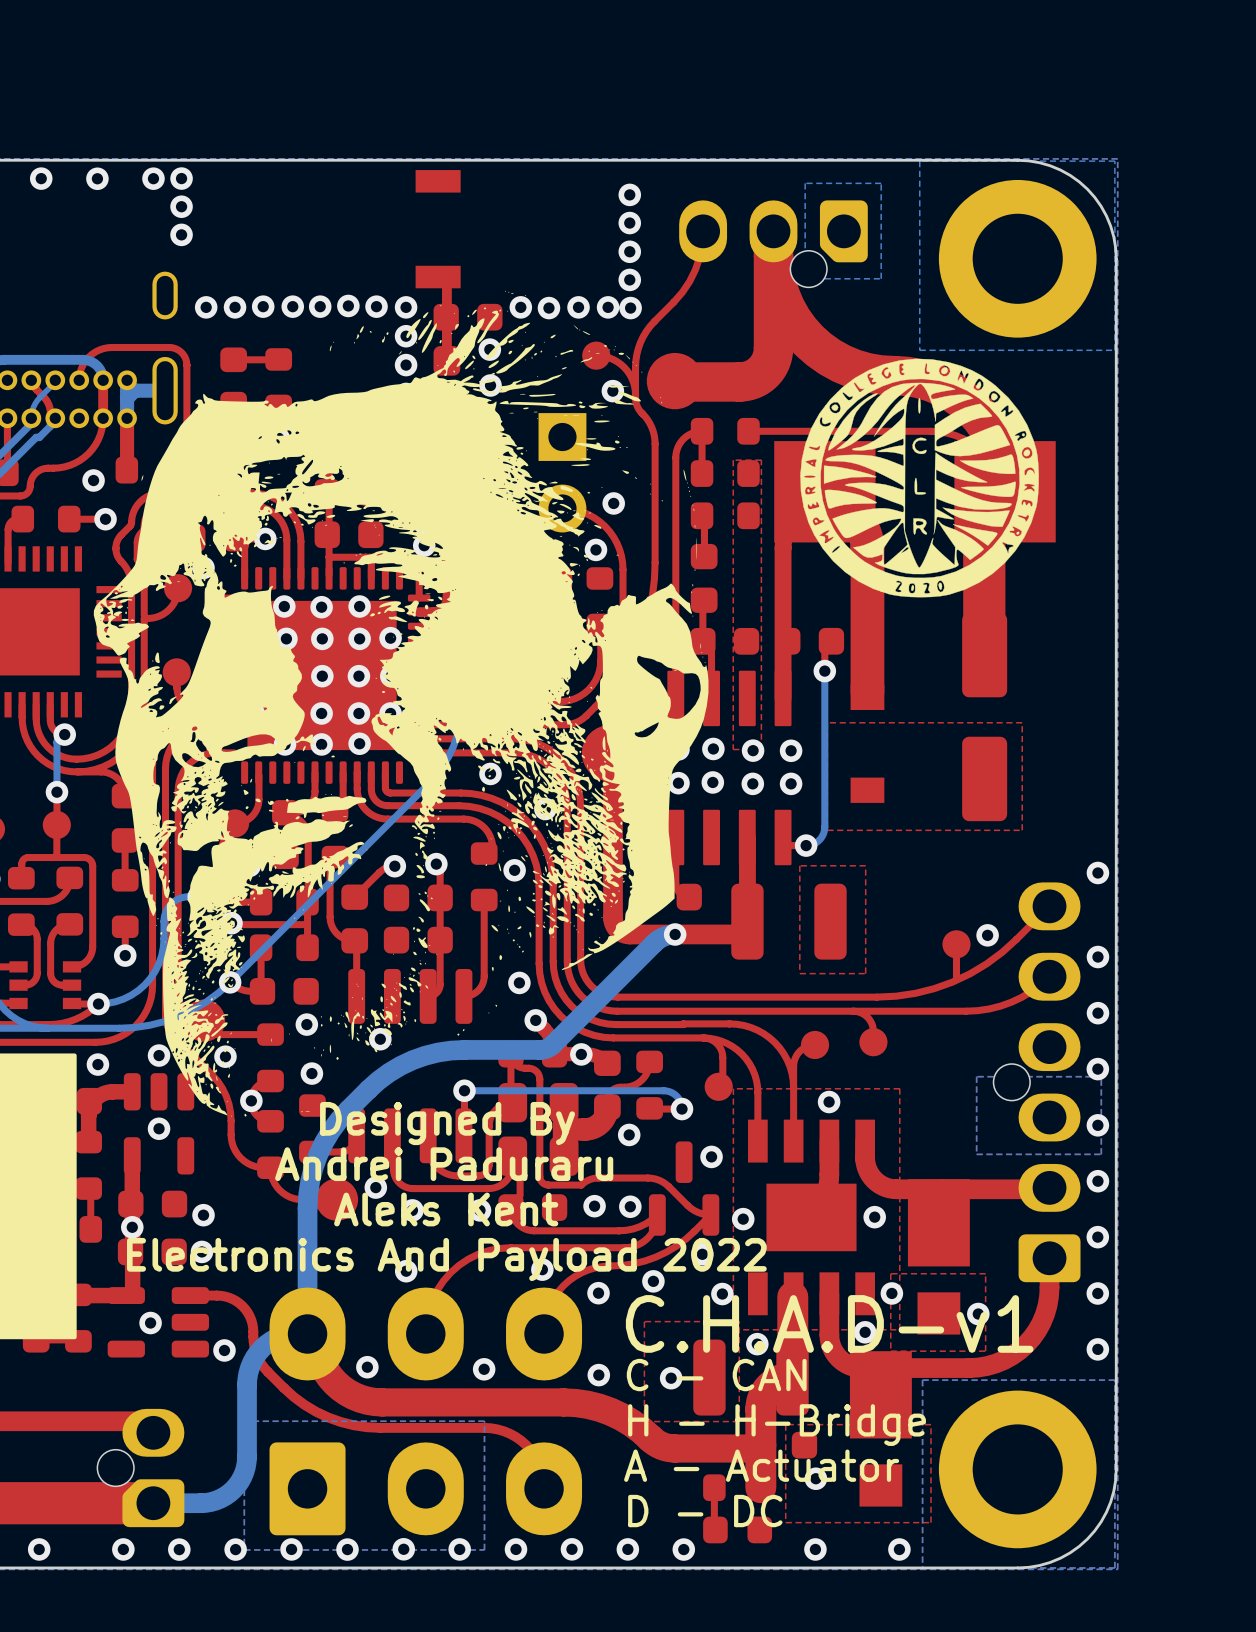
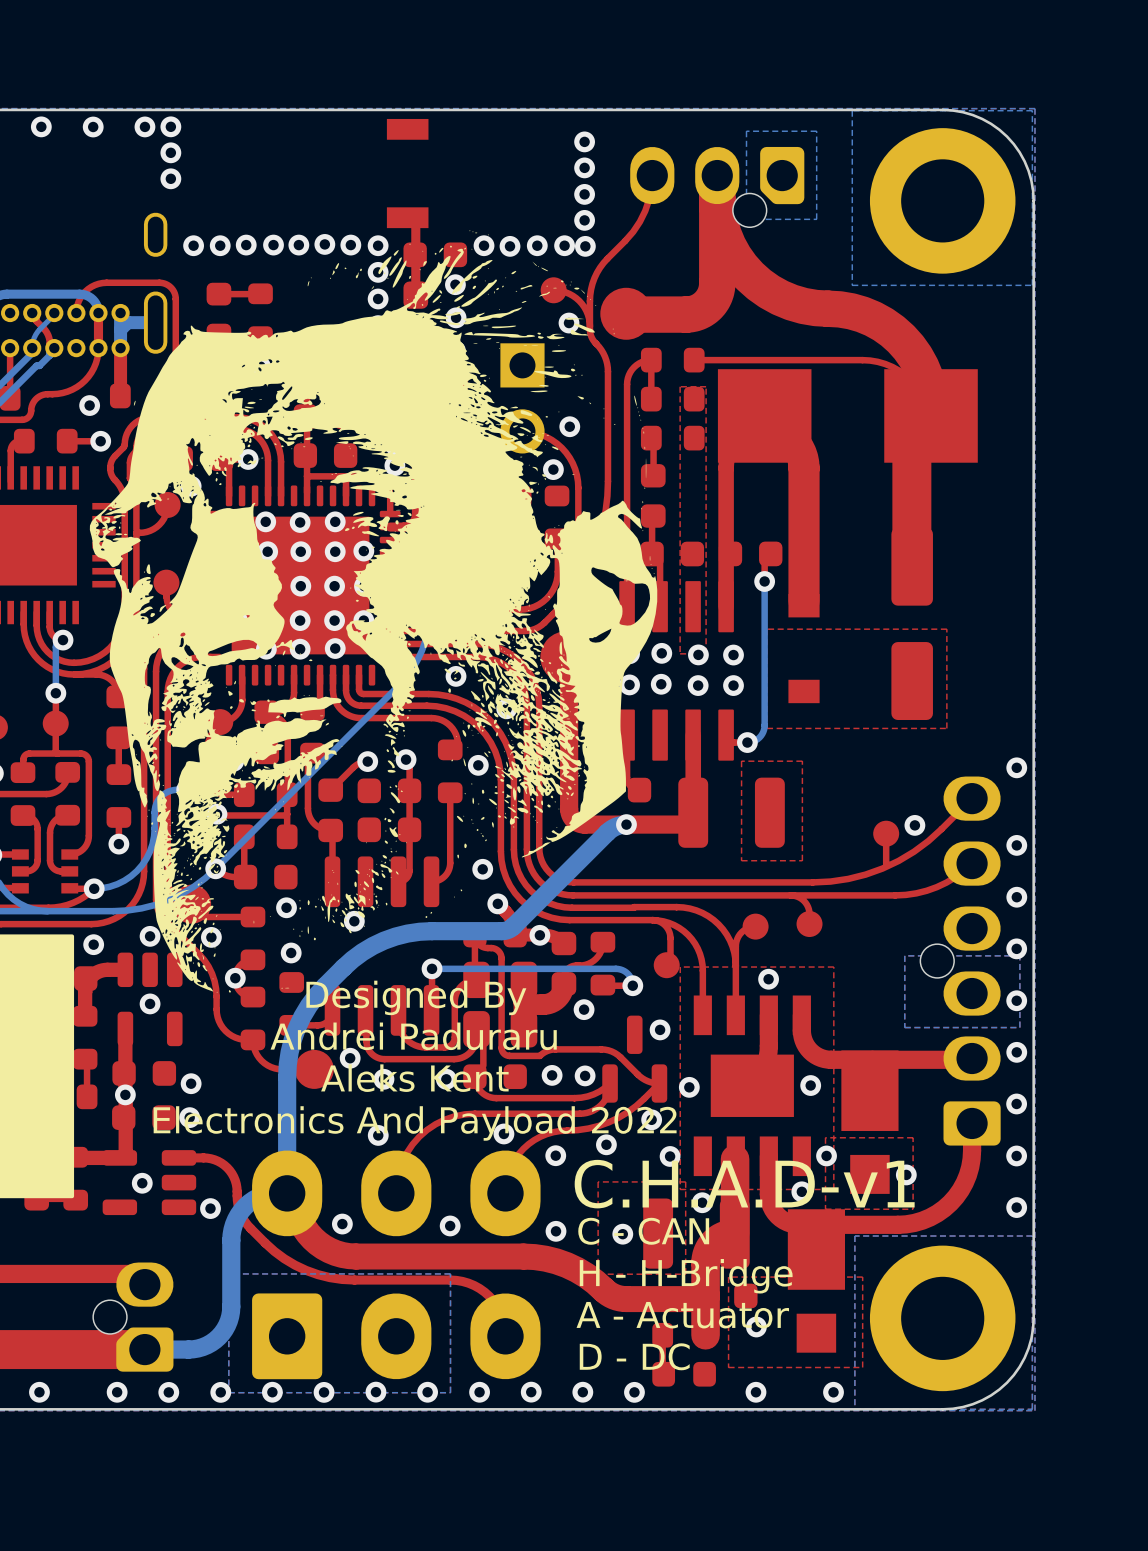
drawing: [800, 358, 1039, 598] -> none

